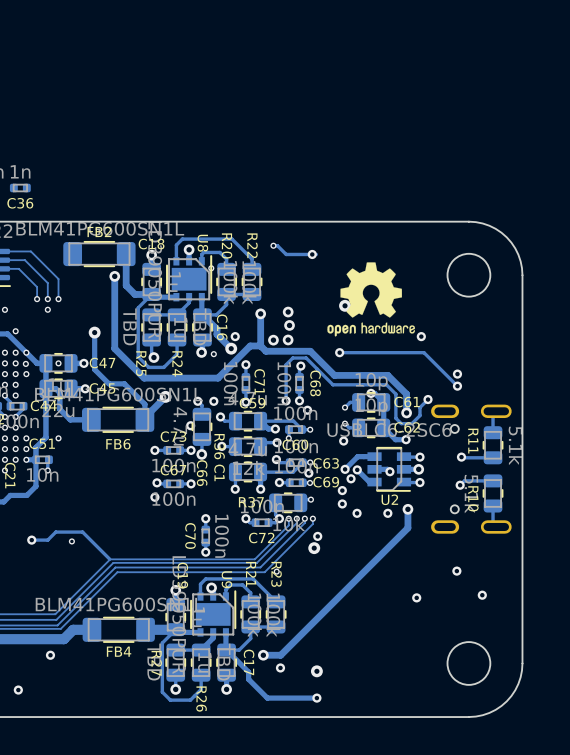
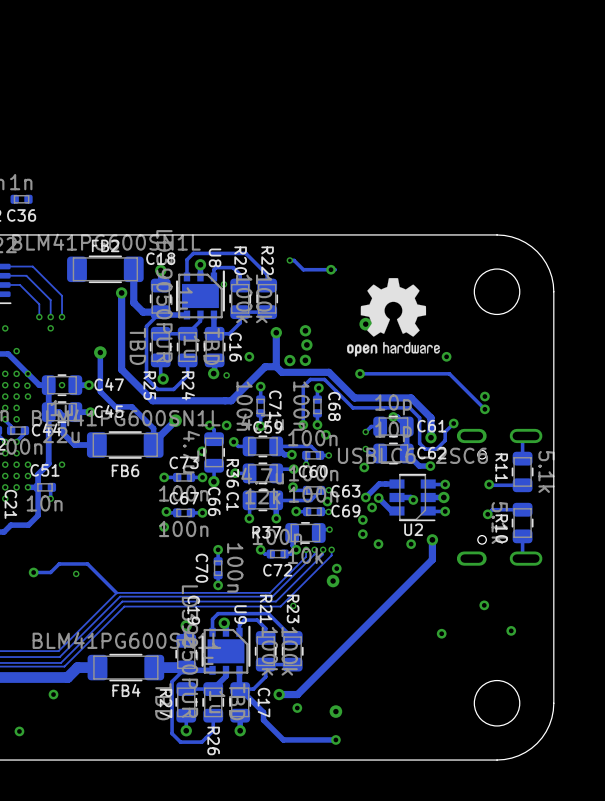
track: (202, 314) (216, 329) (216, 334) (231, 348) -> none
via: (231, 348) -> none

